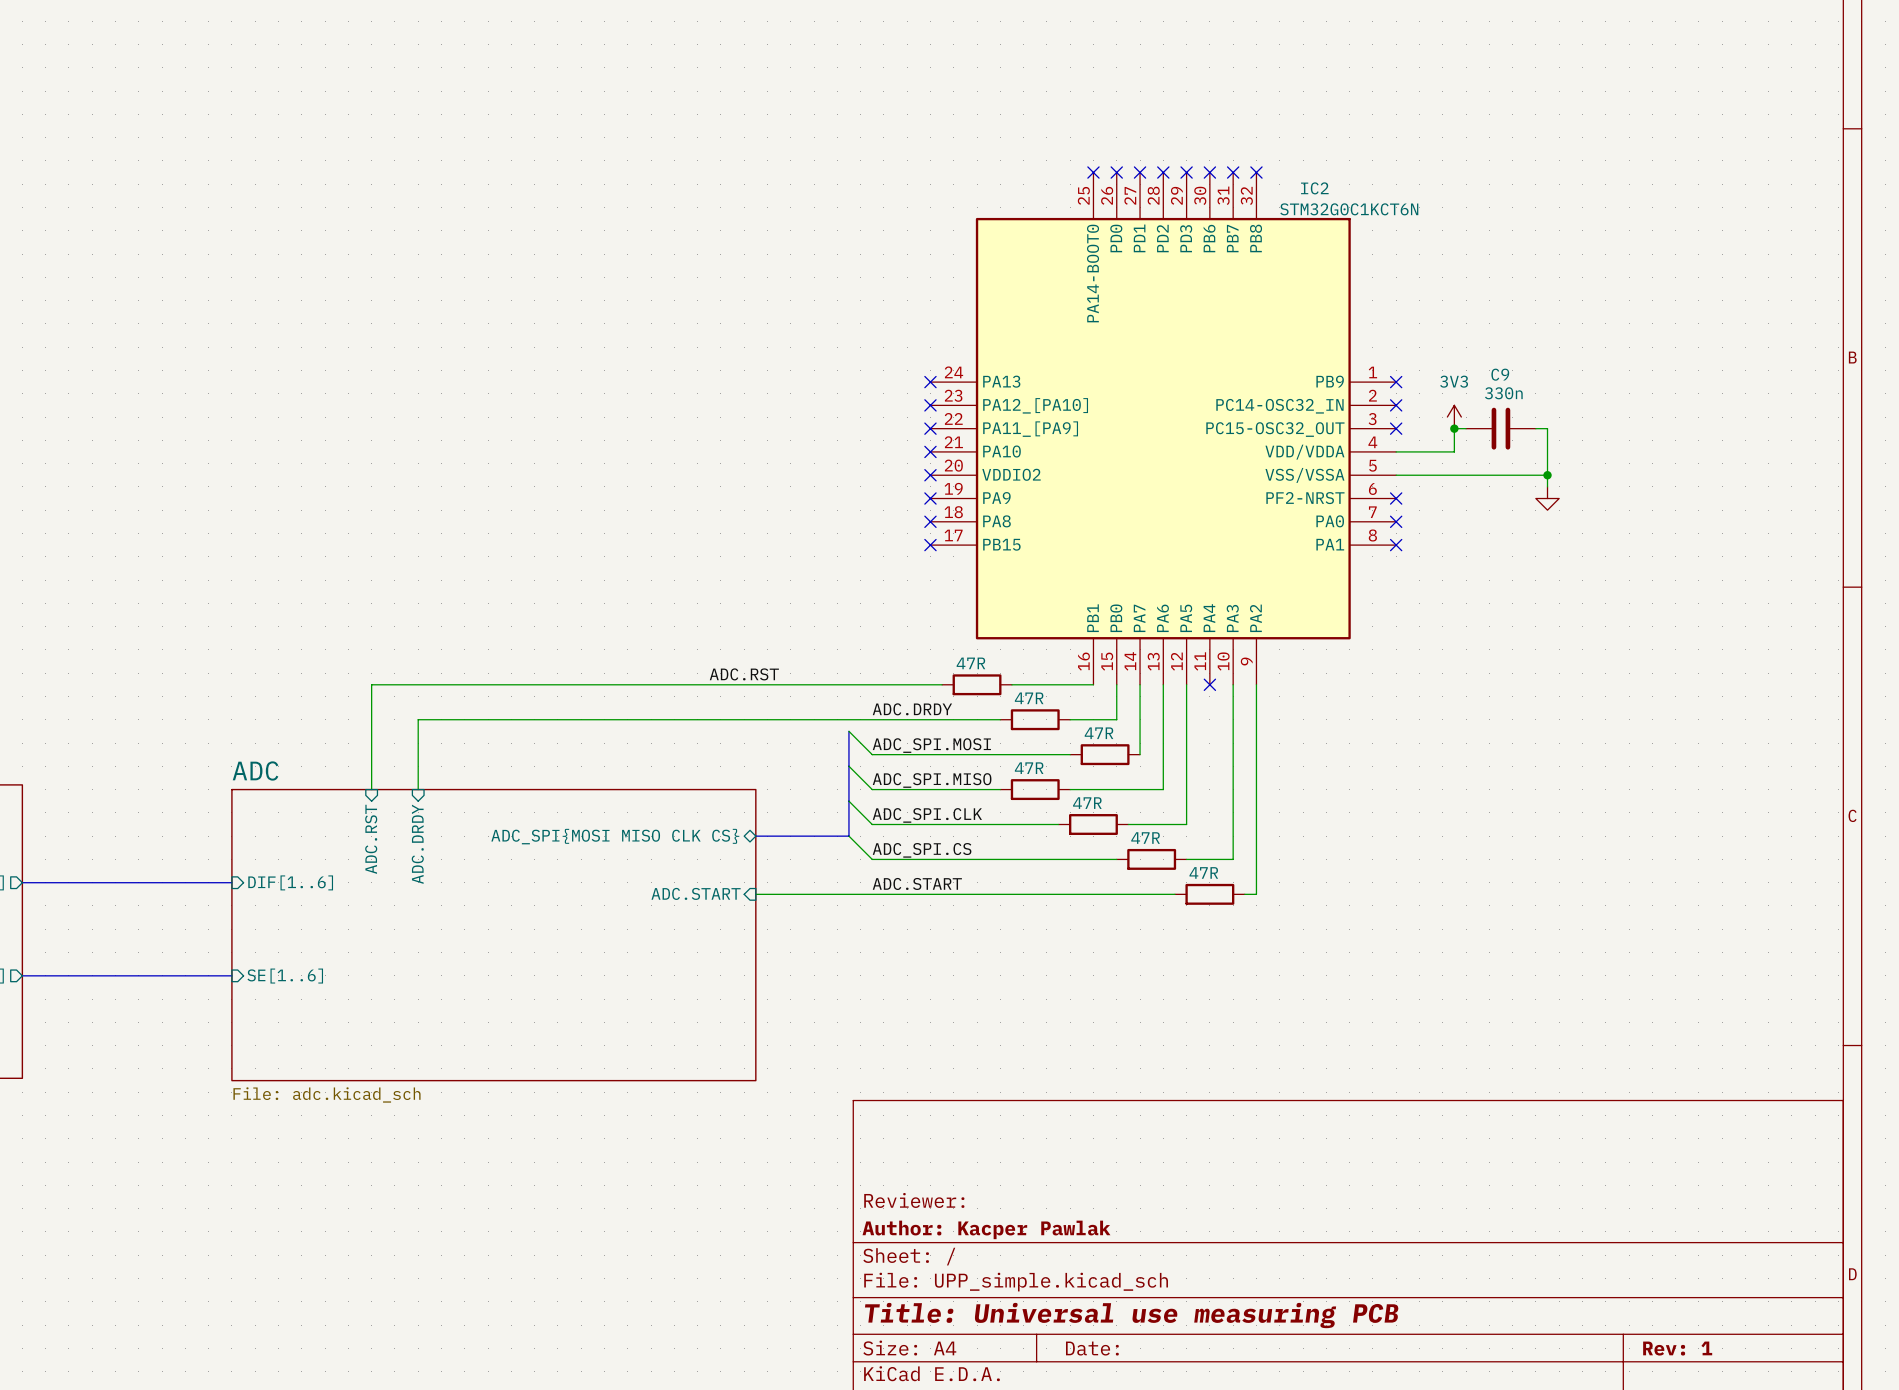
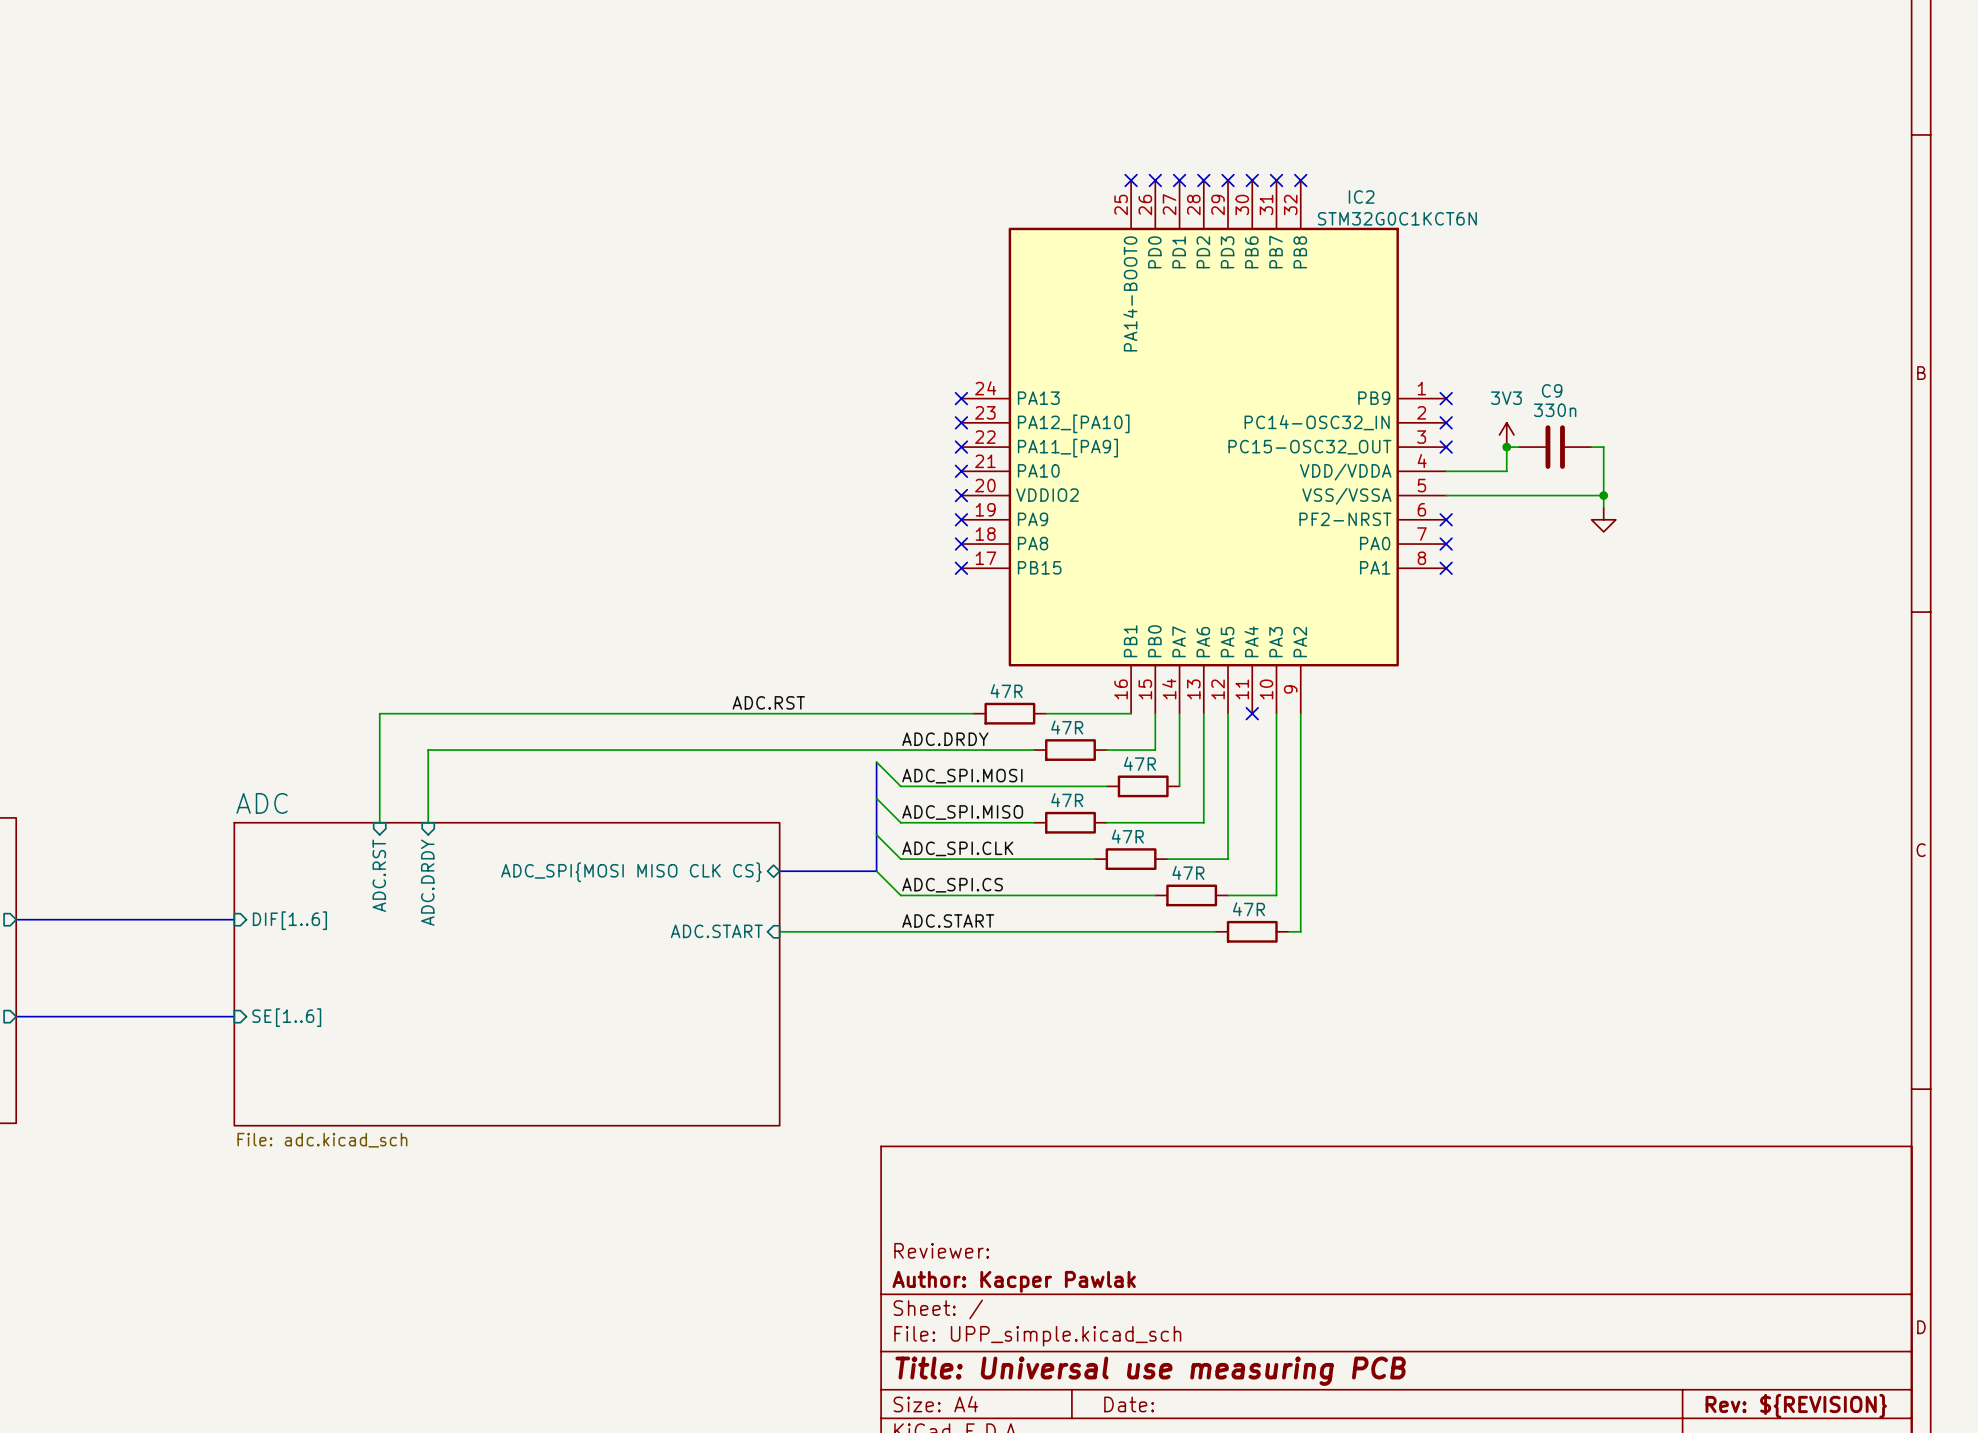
title block: Rev: 1 (1677, 1348) -> Rev: ${REVISION} (1796, 1406)

